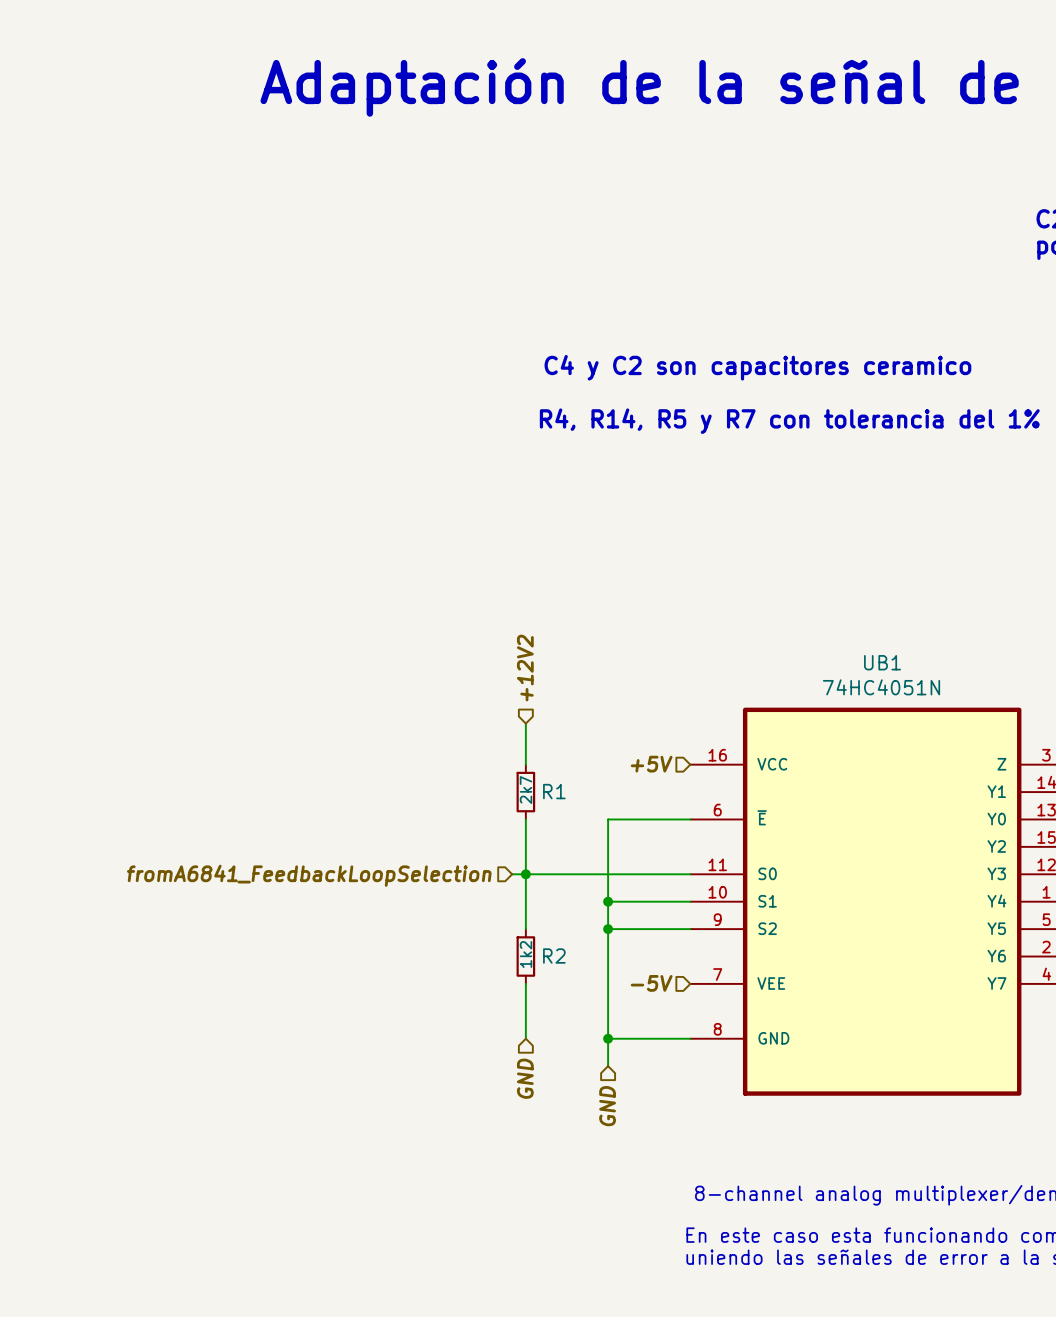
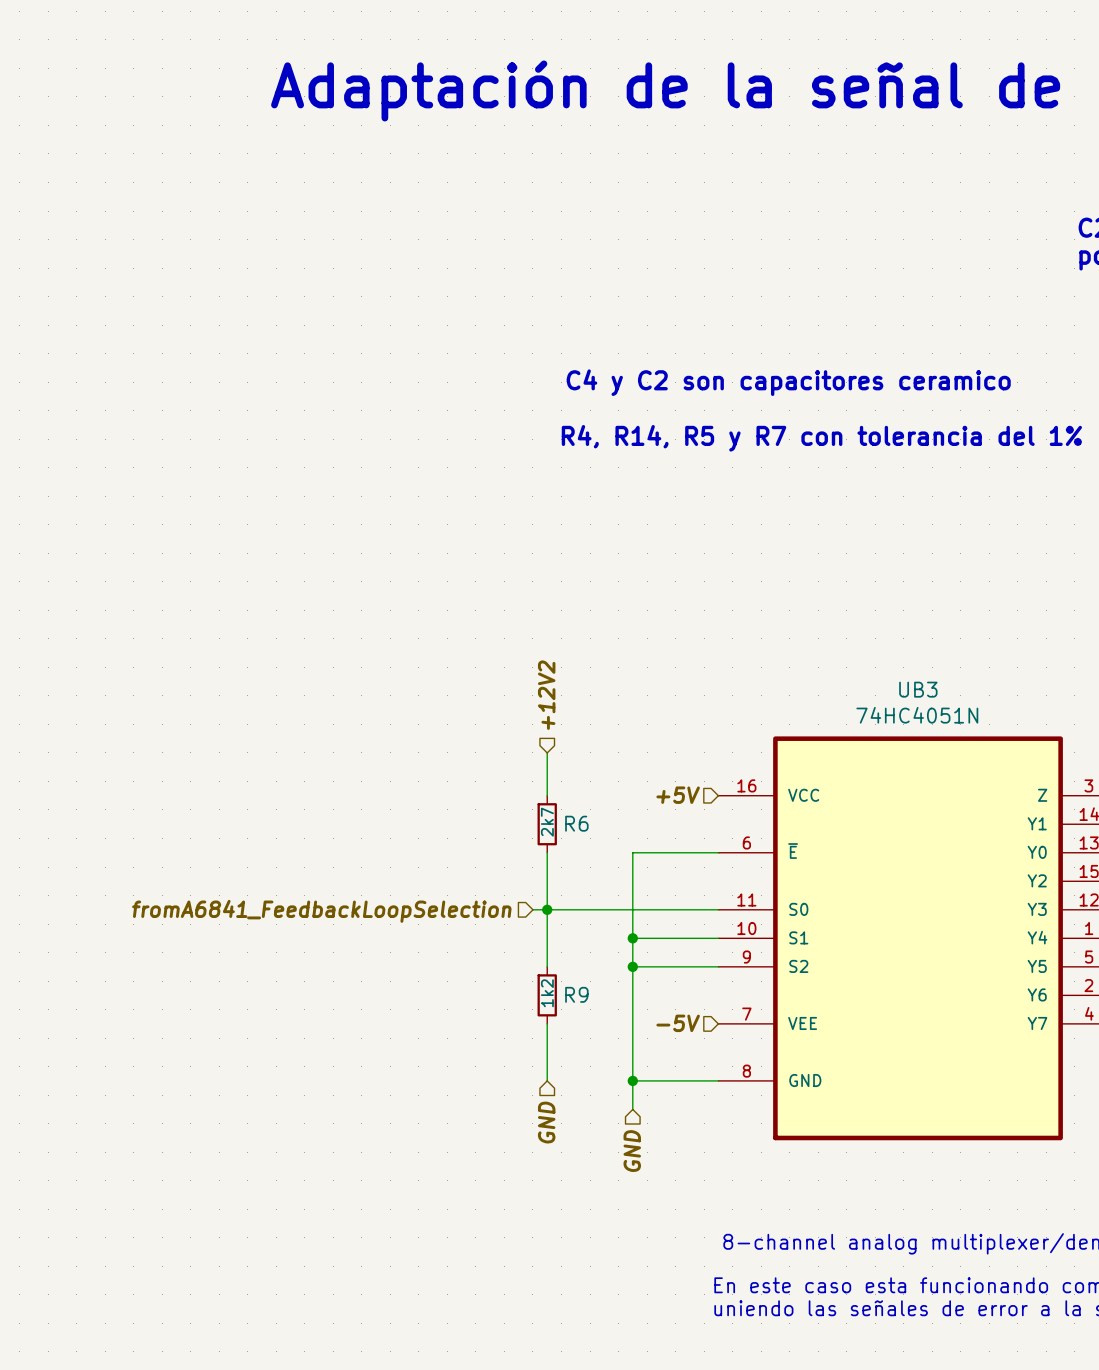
UB1 name: UB1 (882, 662) -> UB3 (918, 689)
R1 name: R1 (554, 791) -> R6 (576, 823)
R2 name: R2 (554, 956) -> R9 (576, 994)

